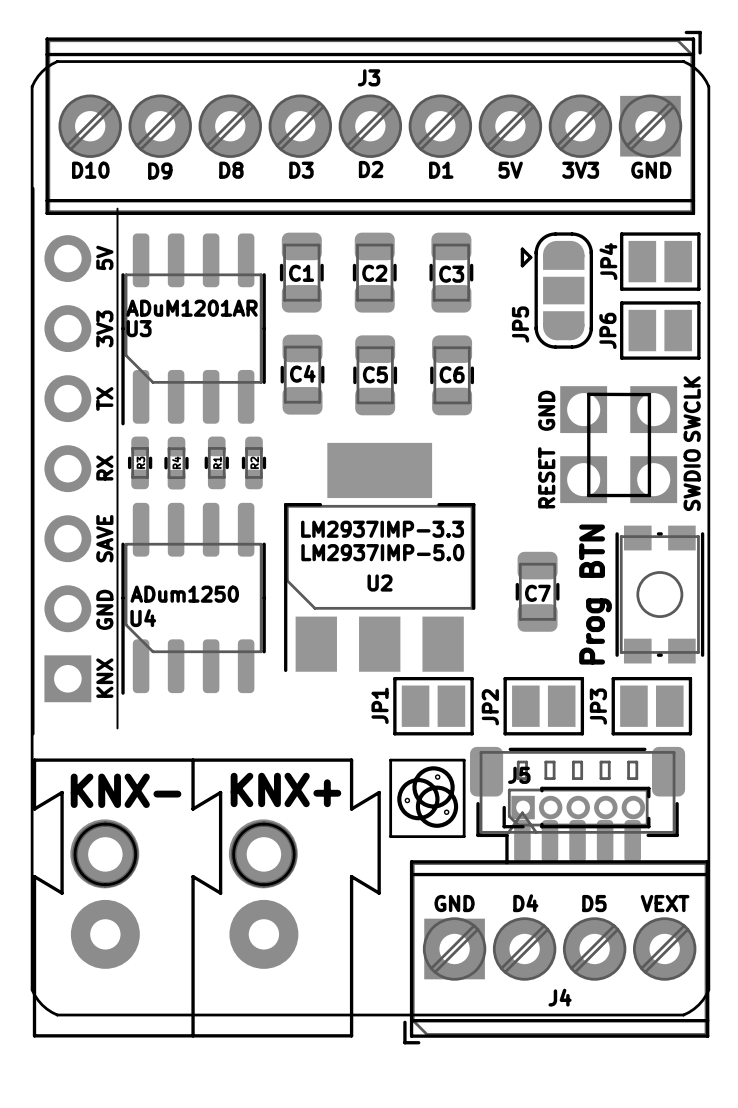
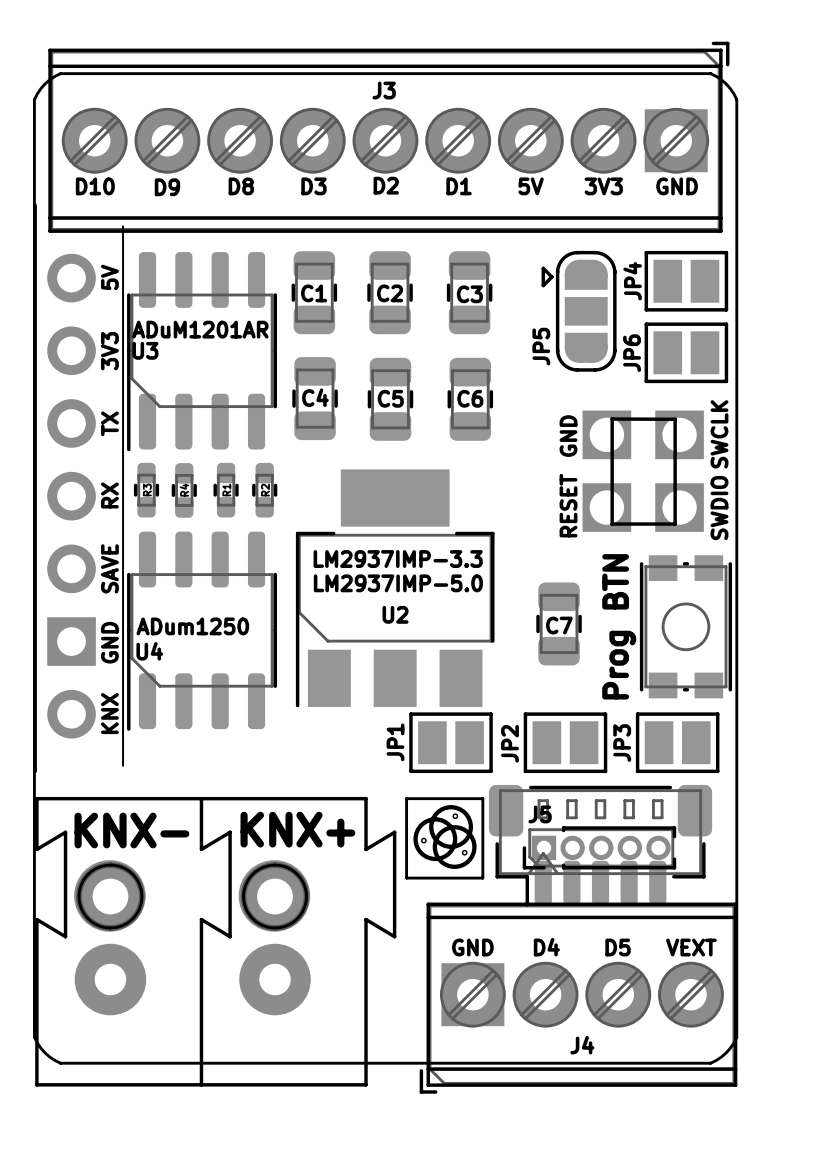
part footprint: [31, 186, 119, 736] -> [33, 203, 124, 774]

